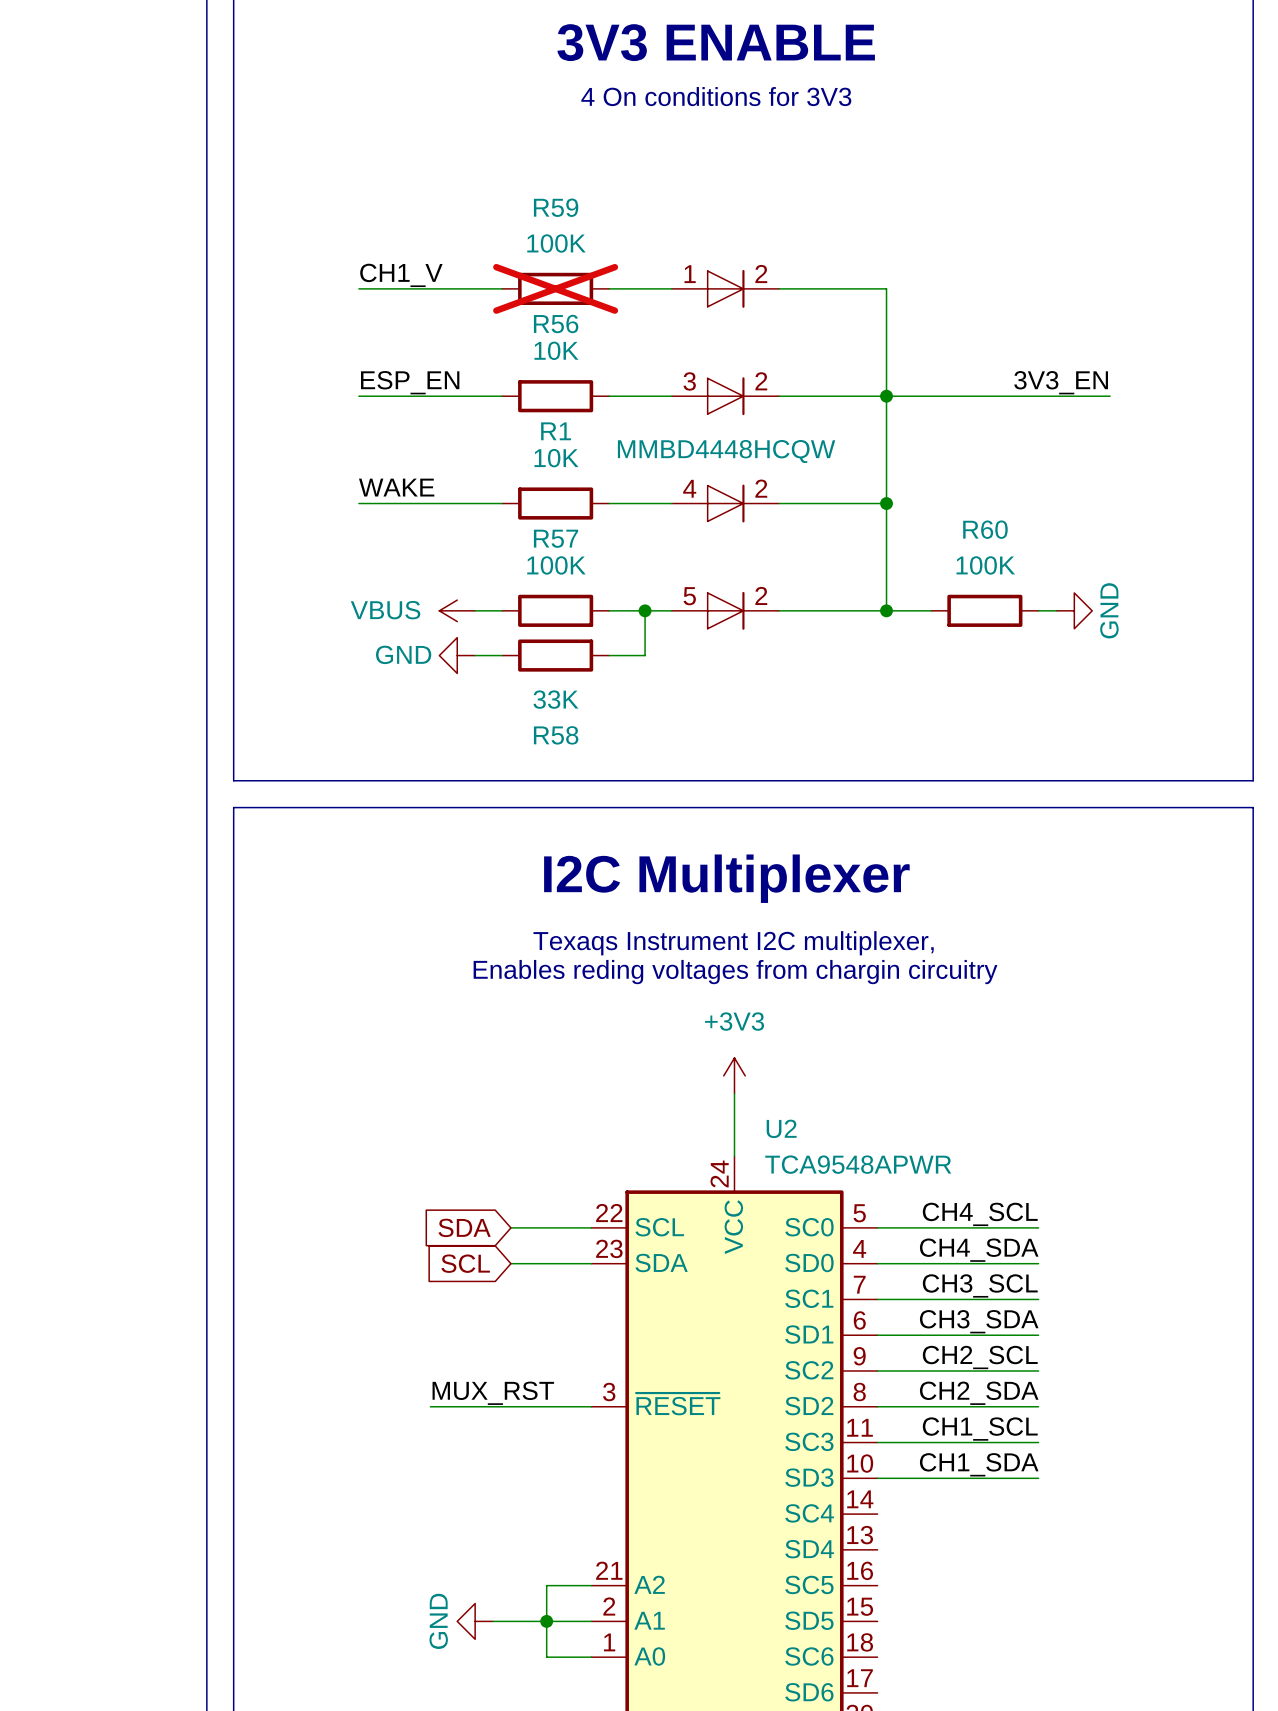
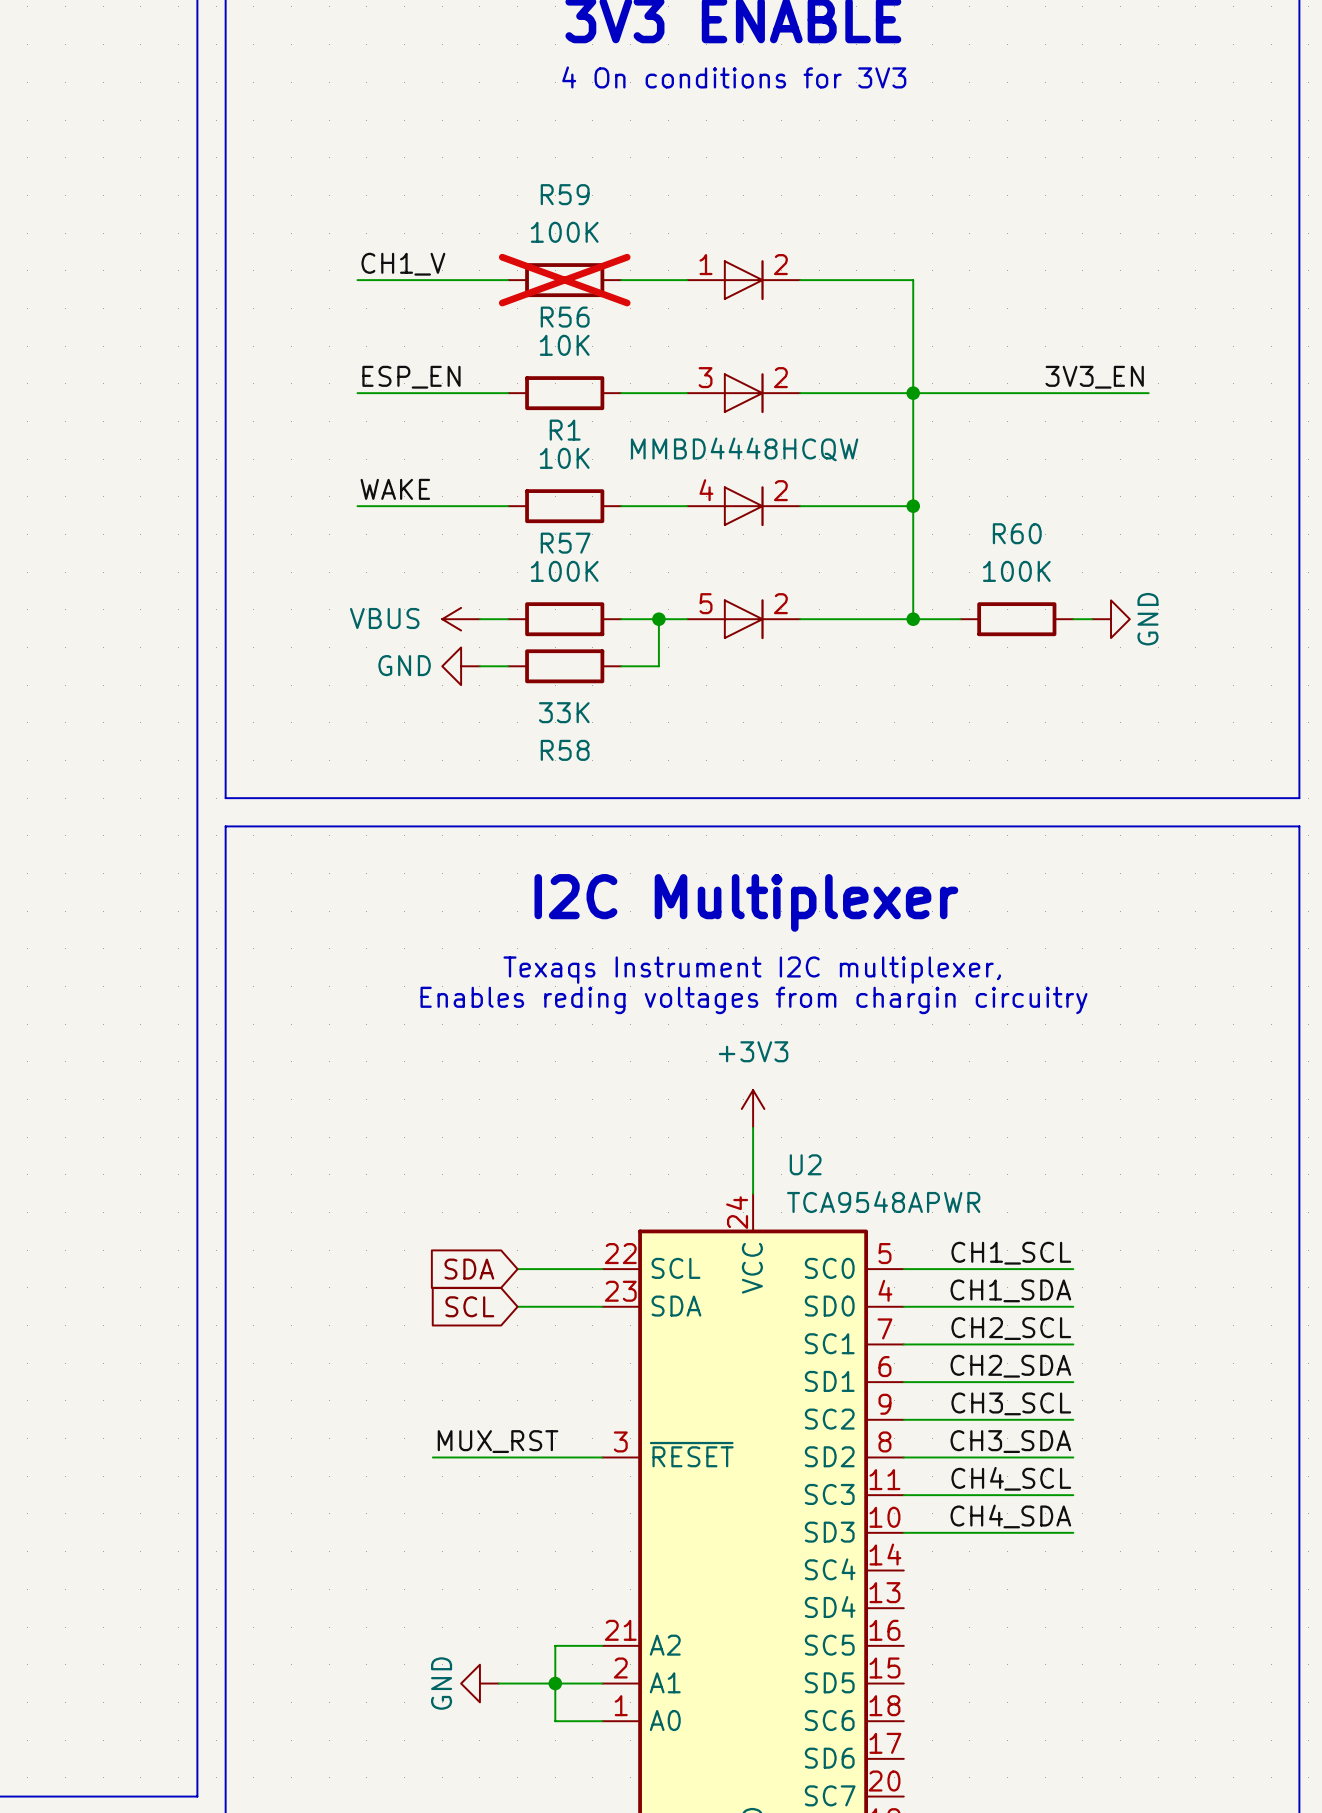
label: CH4_SCL (980, 1214) -> CH1_SCL (1011, 1253)
label: CH4_SDA (979, 1250) -> CH1_SDA (1010, 1290)
label: CH3_SCL (980, 1285) -> CH2_SCL (1011, 1328)
label: CH3_SDA (979, 1321) -> CH2_SDA (1010, 1366)
label: CH2_SCL (980, 1357) -> CH3_SCL (1011, 1403)
label: CH2_SDA (979, 1393) -> CH3_SDA (1010, 1441)
label: CH1_SCL (980, 1429) -> CH4_SCL (1011, 1478)
label: CH1_SDA (979, 1464) -> CH4_SDA (1010, 1516)

